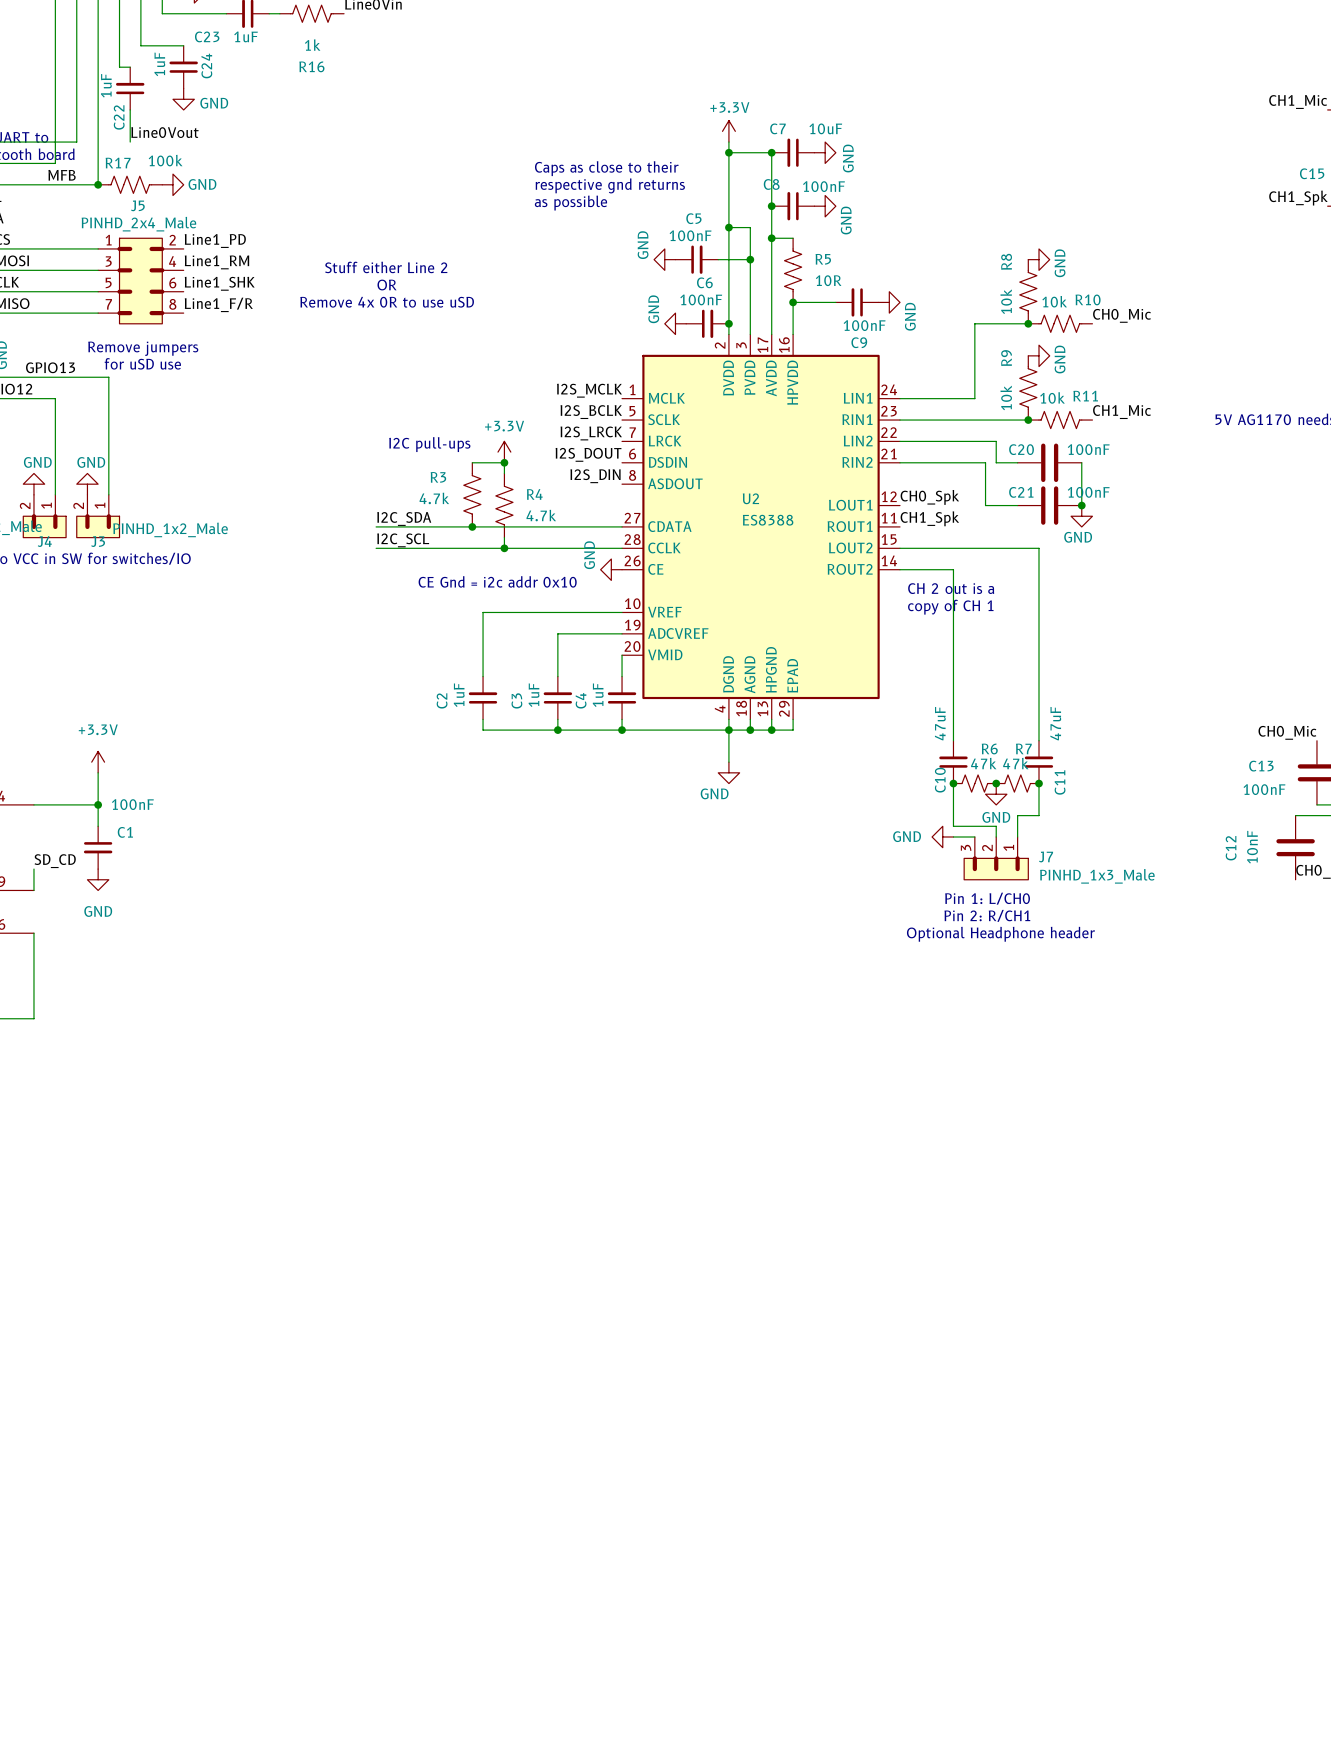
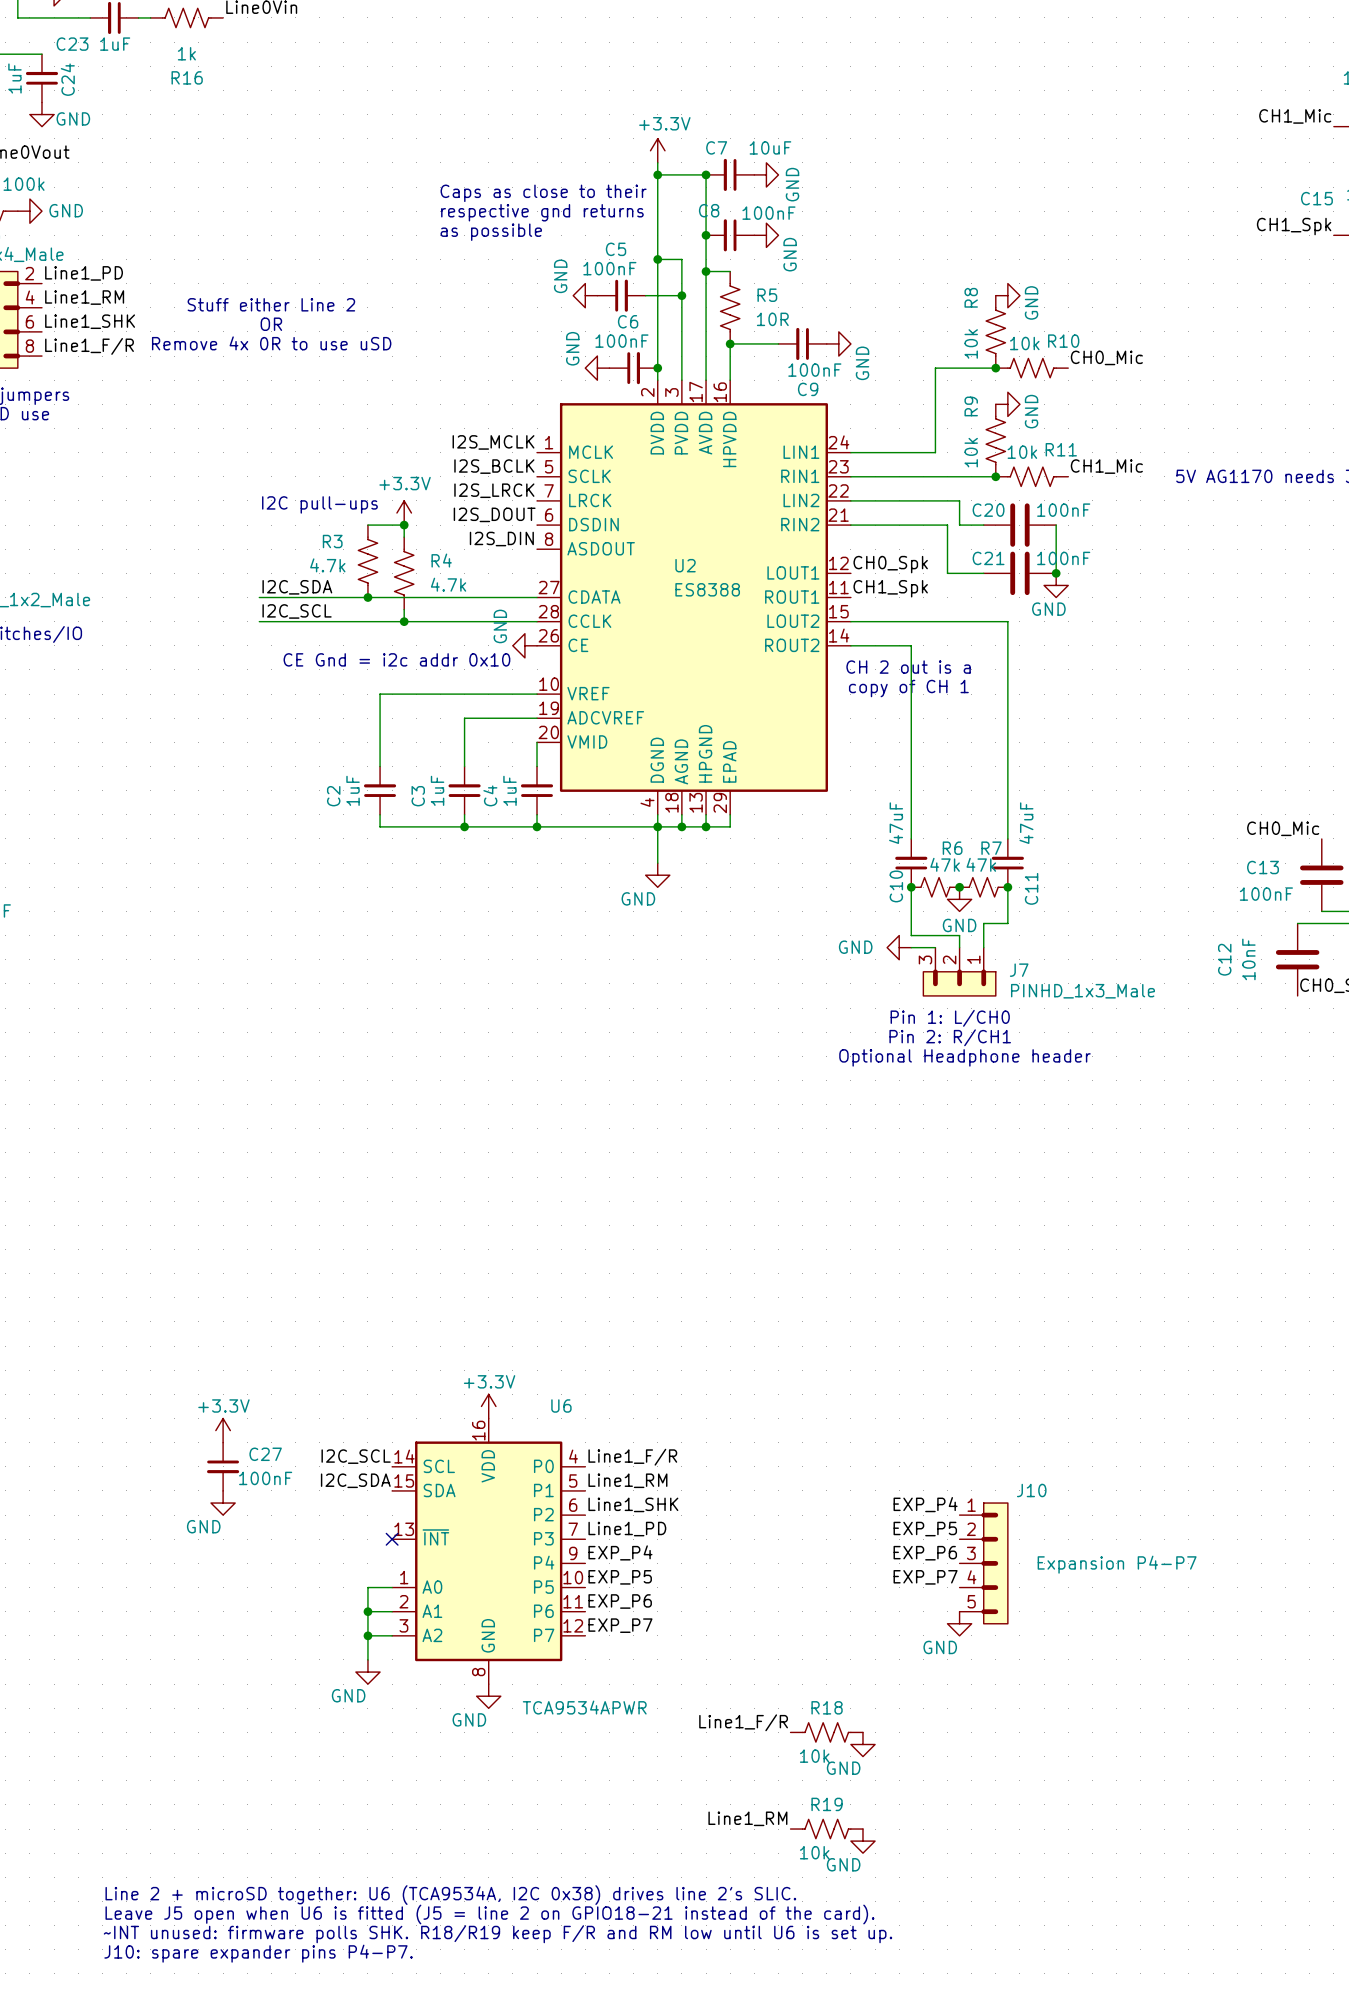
power symbol: none -> +3.3V (488, 1406)
power symbol: none -> +3.3V (223, 1430)
label: none -> I2C_SCL (356, 1456)
label: none -> Line1_F/R (632, 1457)
C27: none -> 100nF (223, 1466)
label: none -> I2C_SDA (355, 1480)
label: none -> Line1_RM (627, 1480)
power symbol: none -> GND (223, 1503)
label: none -> Line1_SHK (633, 1504)
label: none -> EXP_P4 (925, 1504)
label: none -> Line1_PD (627, 1529)
label: none -> EXP_P5 (925, 1529)
no-connect mark: none -> (392, 1539)
U6: none -> TCA9534APWR (488, 1551)
label: none -> EXP_P4 (620, 1552)
label: none -> EXP_P6 (925, 1553)
J10: none -> Expansion P4-P7 (983, 1563)
label: none -> EXP_P5 (620, 1577)
label: none -> EXP_P7 (925, 1577)
wire: none -> (392, 1587) (367, 1587) (367, 1659)
label: none -> EXP_P6 (620, 1601)
wire: none -> (367, 1611) (392, 1611)
junction: none -> (367, 1611)
power symbol: none -> GND (959, 1623)
label: none -> EXP_P7 (620, 1625)
wire: none -> (367, 1635) (392, 1635)
junction: none -> (367, 1635)
power symbol: none -> GND (367, 1672)
power symbol: none -> GND (488, 1696)
label: none -> Line1_F/R (743, 1722)
R18: none -> 10k (826, 1732)
power symbol: none -> GND (862, 1744)
label: none -> Line1_RM (747, 1818)
R19: none -> 10k (826, 1829)
power symbol: none -> GND (862, 1841)
text: none -> Line 2 + microSD together: U6 (TCA9534A, I2C 0x38) drives line 2's SLIC. (450, 1895)
text: none -> Leave J5 open when U6 is fitted (J5 = line 2 on GPIO18-21 instead of the card). (489, 1914)
text: none -> ~INT unused: firmware polls SHK. R18/R19 keep F/R and RM low until U6 is set up. (498, 1934)
text: none -> J10: spare expander pins P4-P7. (258, 1953)

